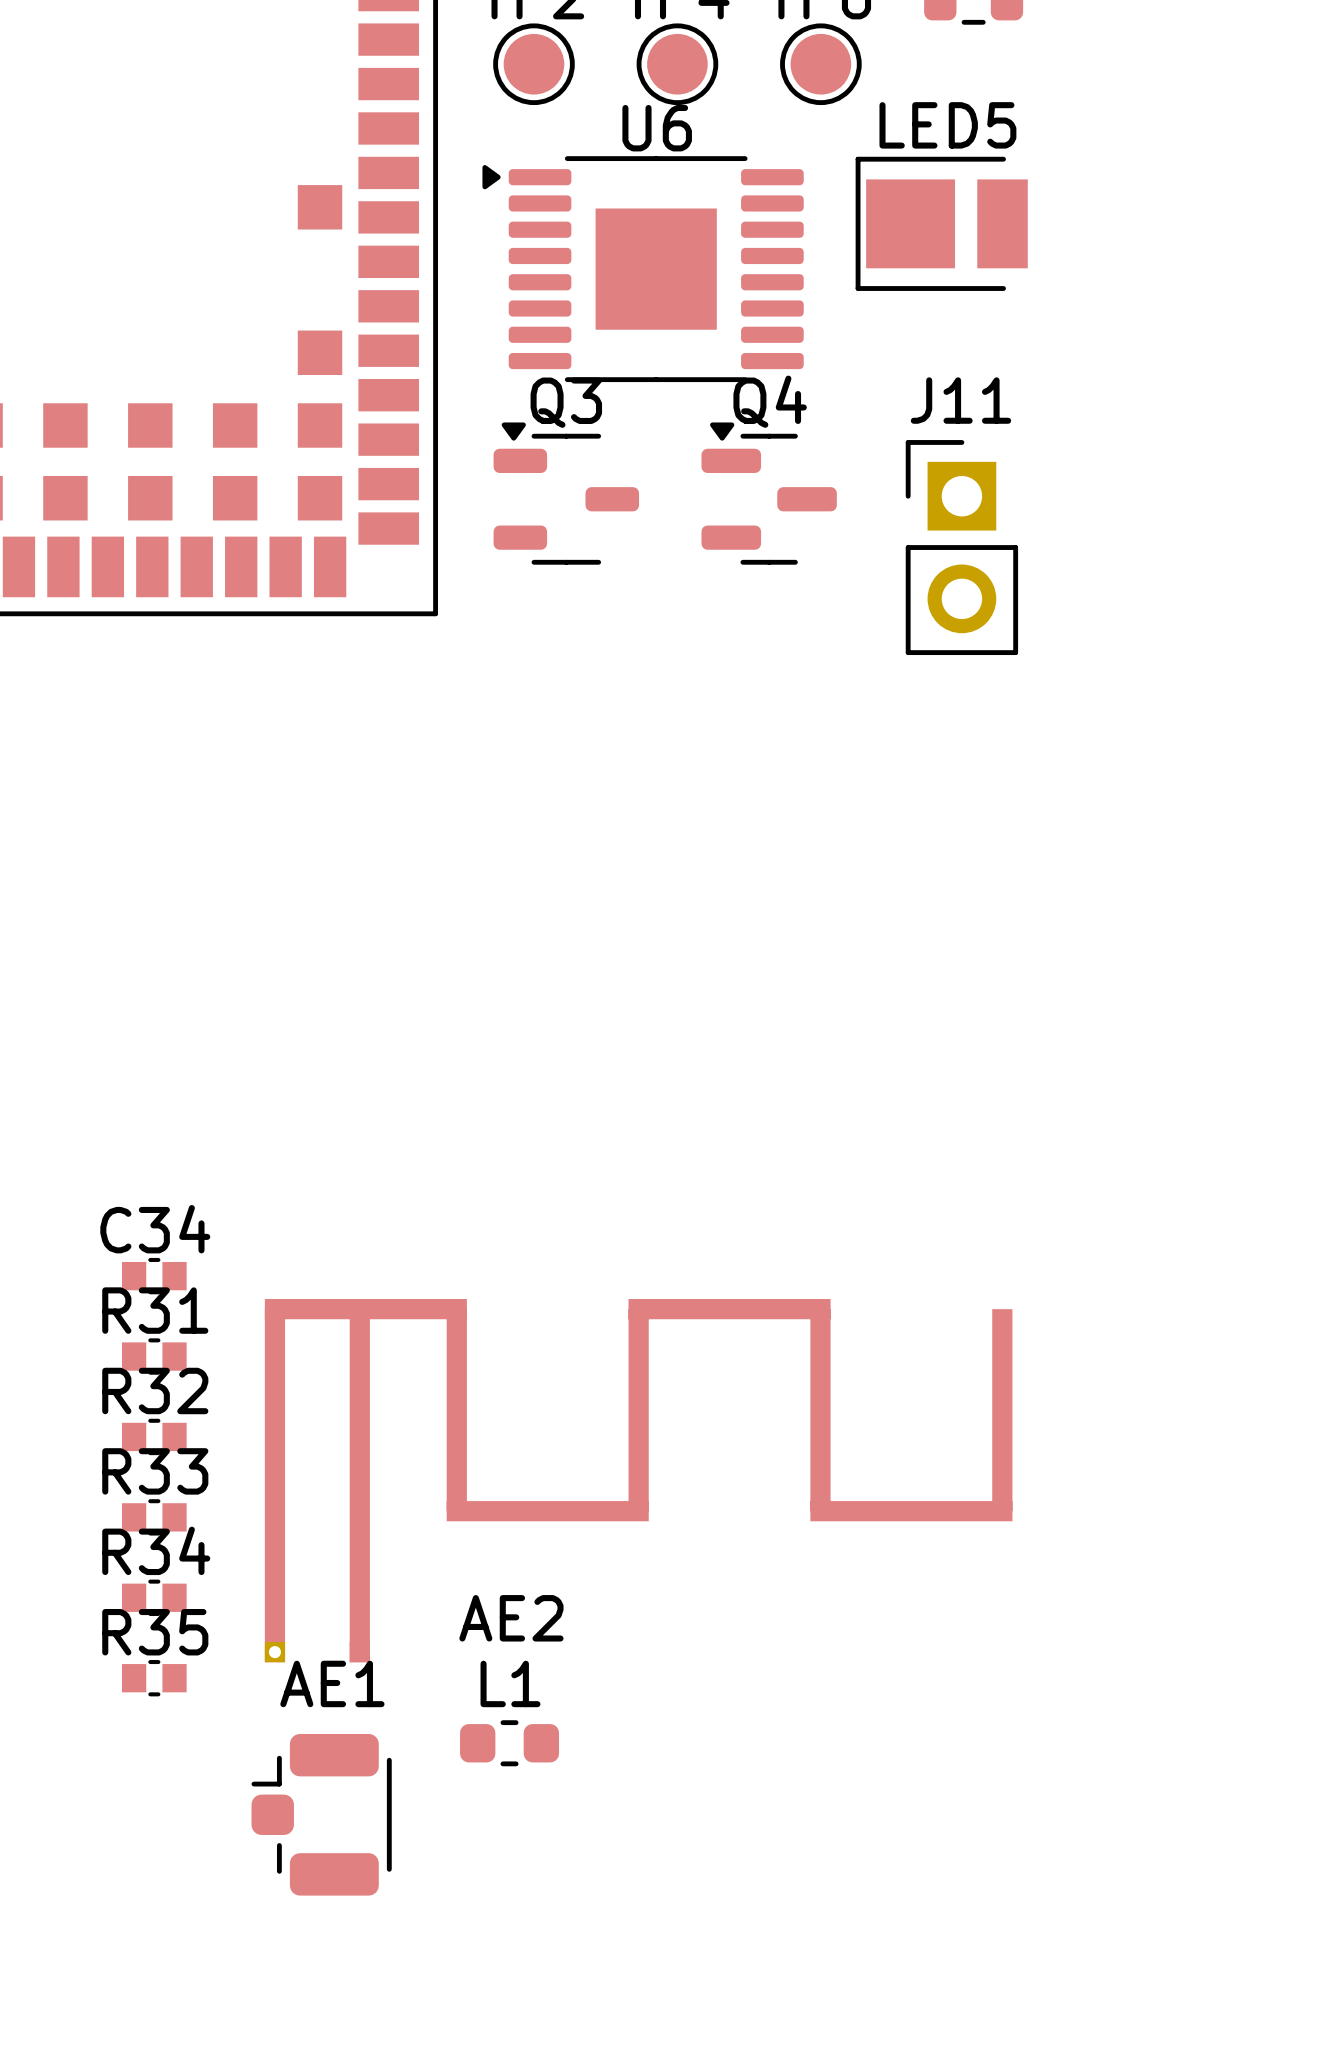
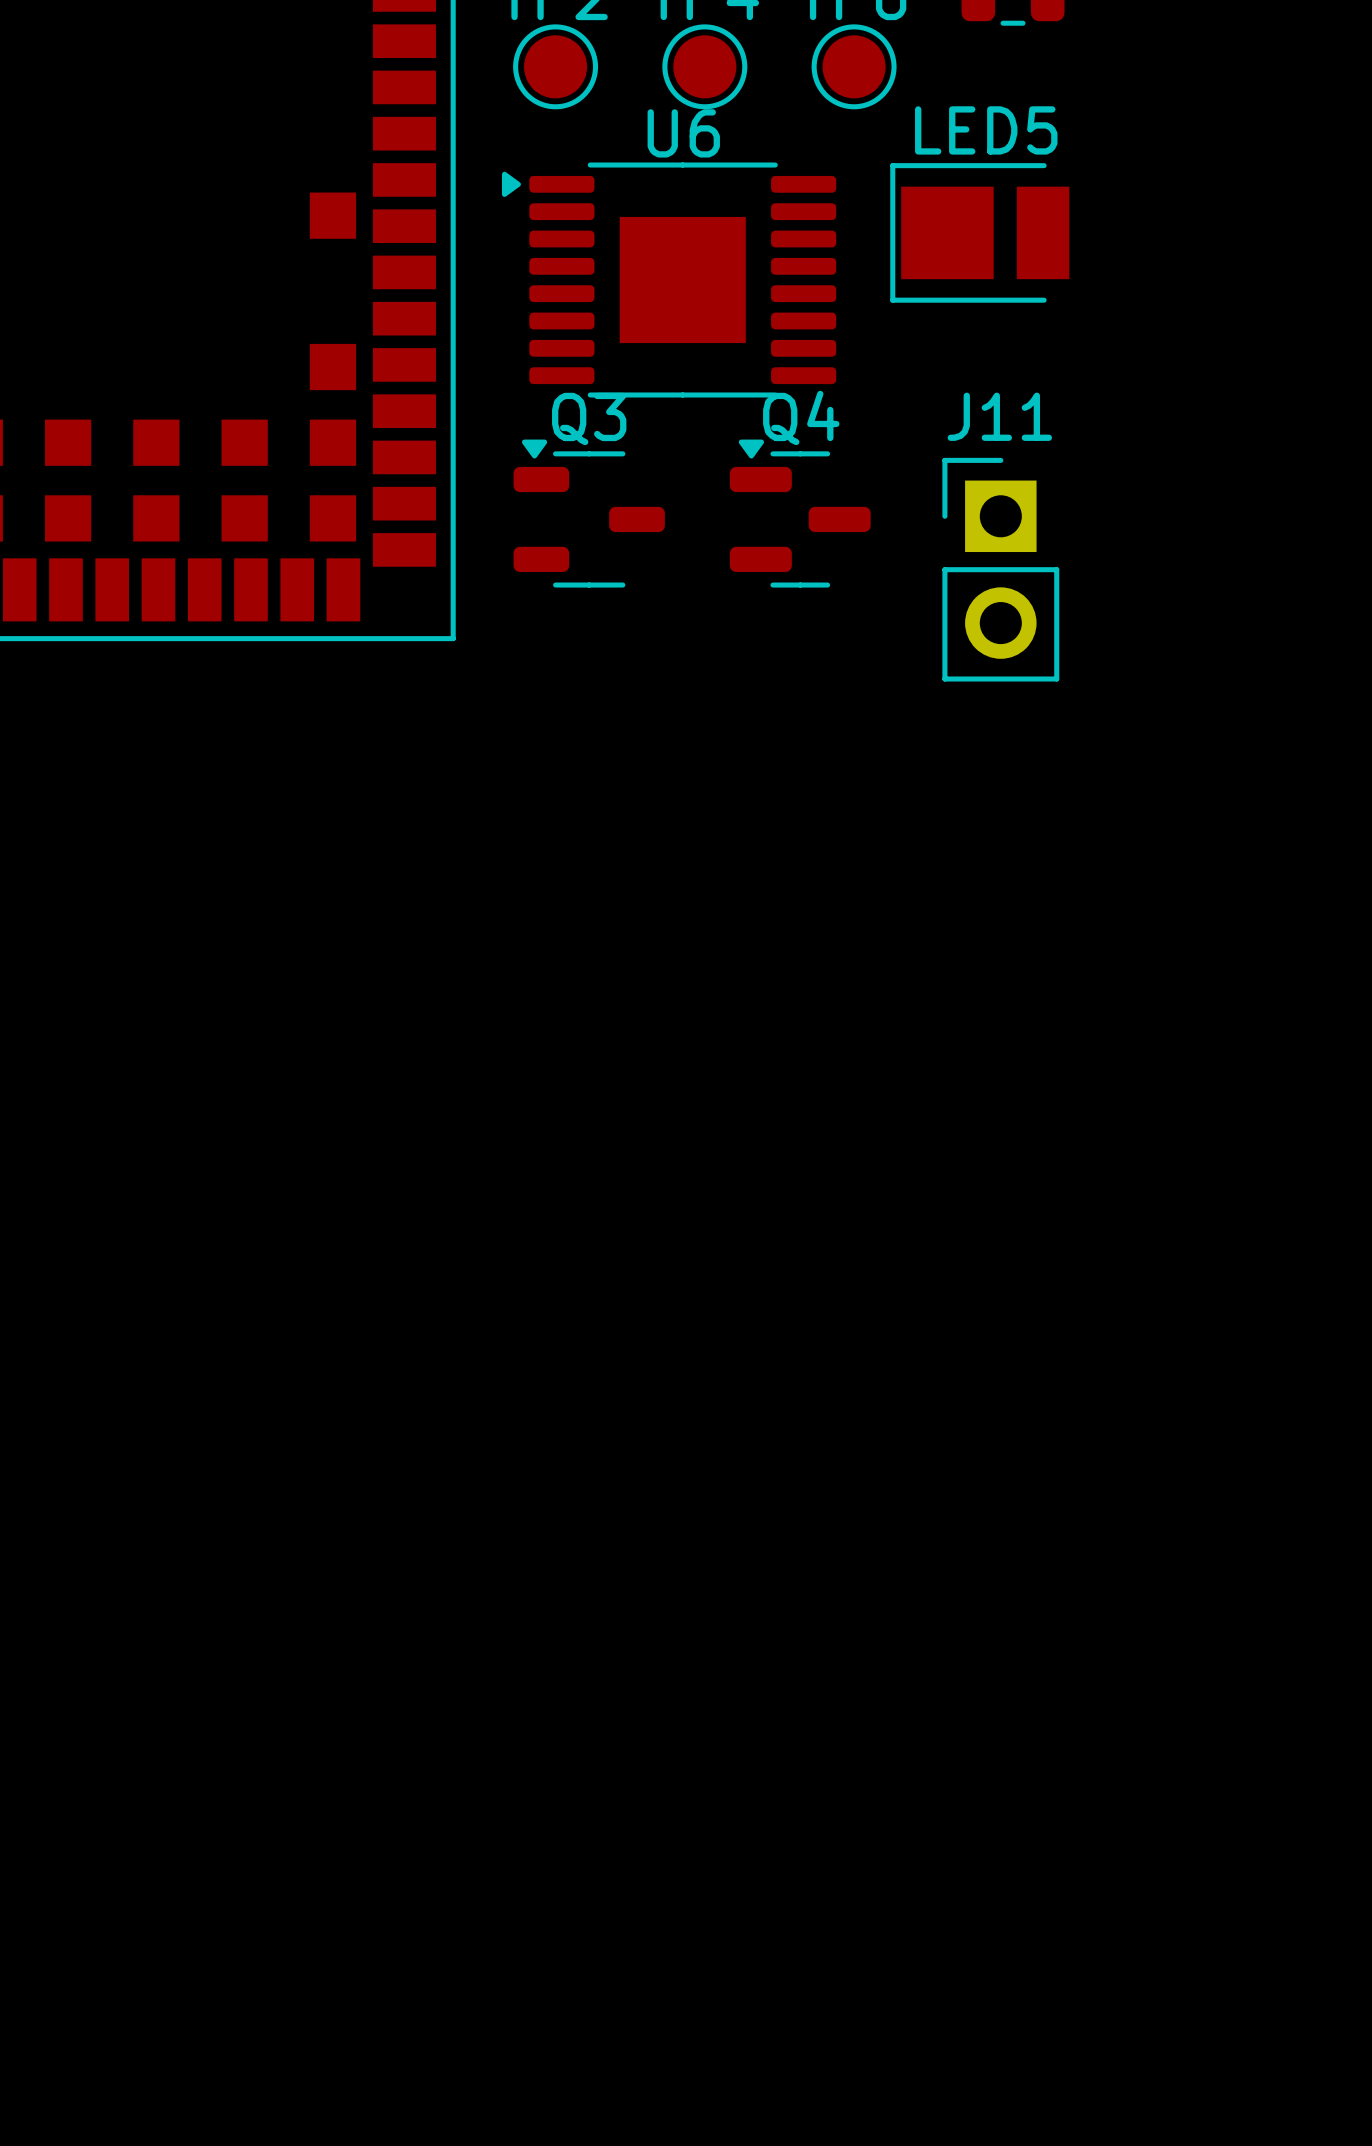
C34: (154, 1276) -> none
R31: (154, 1356) -> none
R32: (154, 1436) -> none
AE2: (638, 1480) -> none
R33: (154, 1517) -> none
R34: (154, 1597) -> none
R35: (154, 1678) -> none
L1: (509, 1743) -> none
AE1: (321, 1814) -> none

